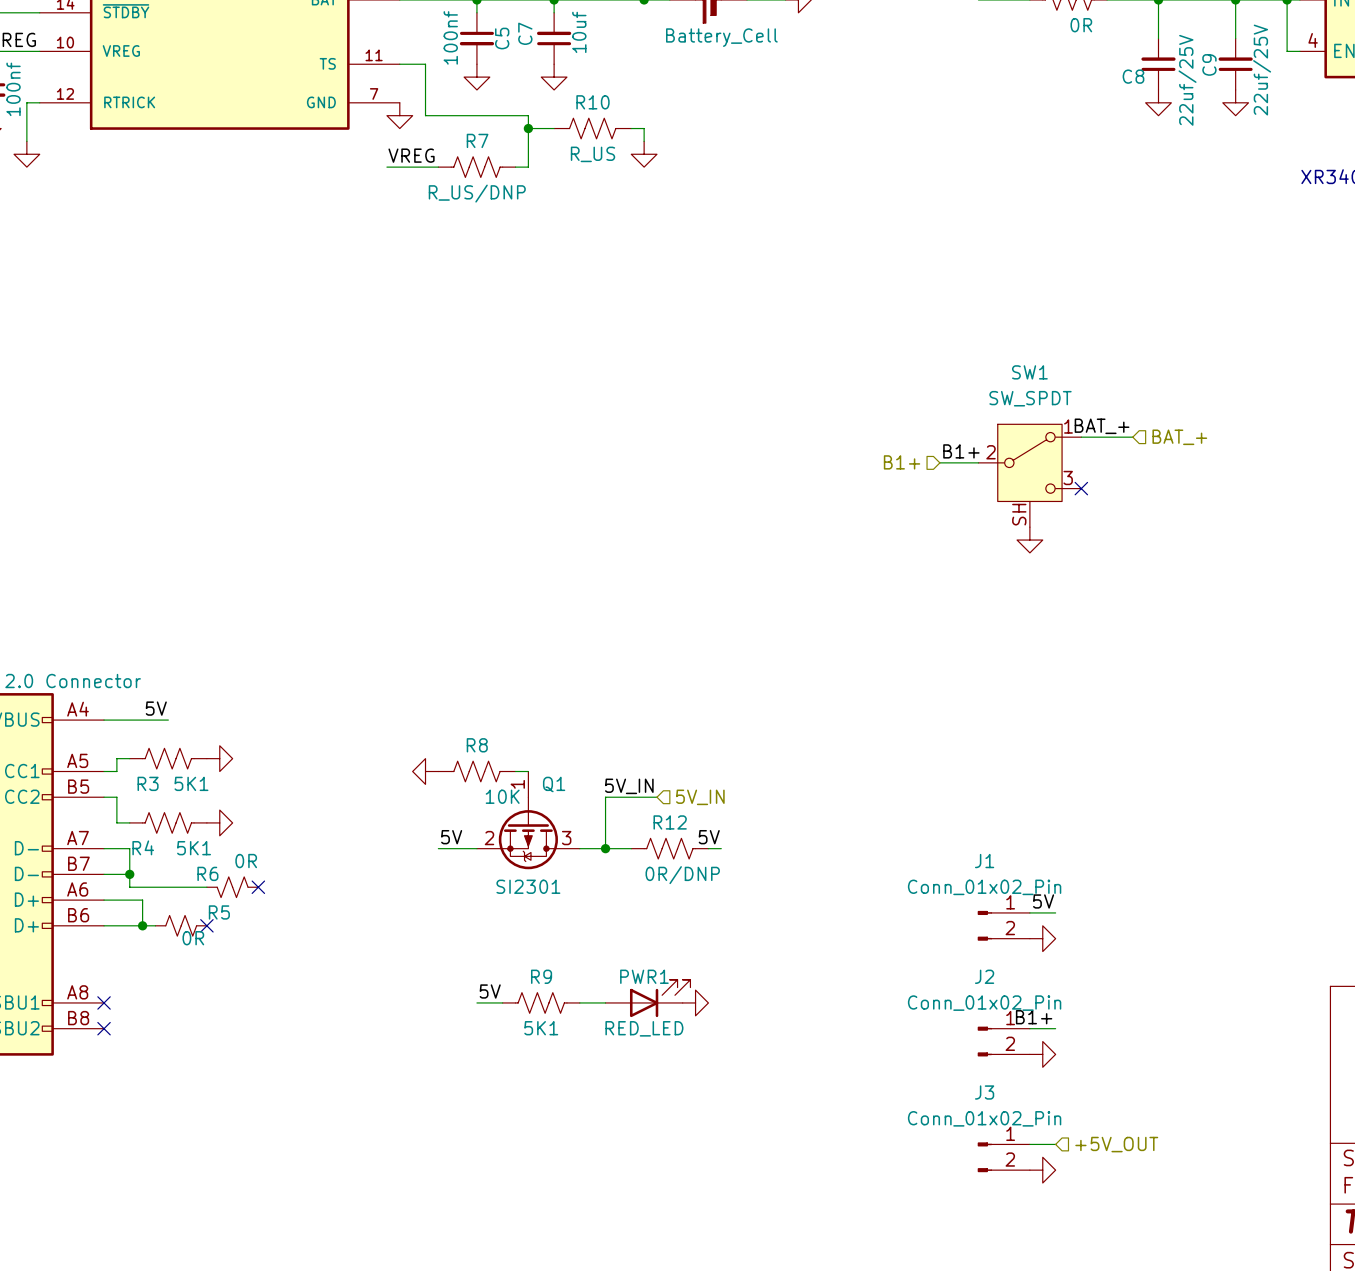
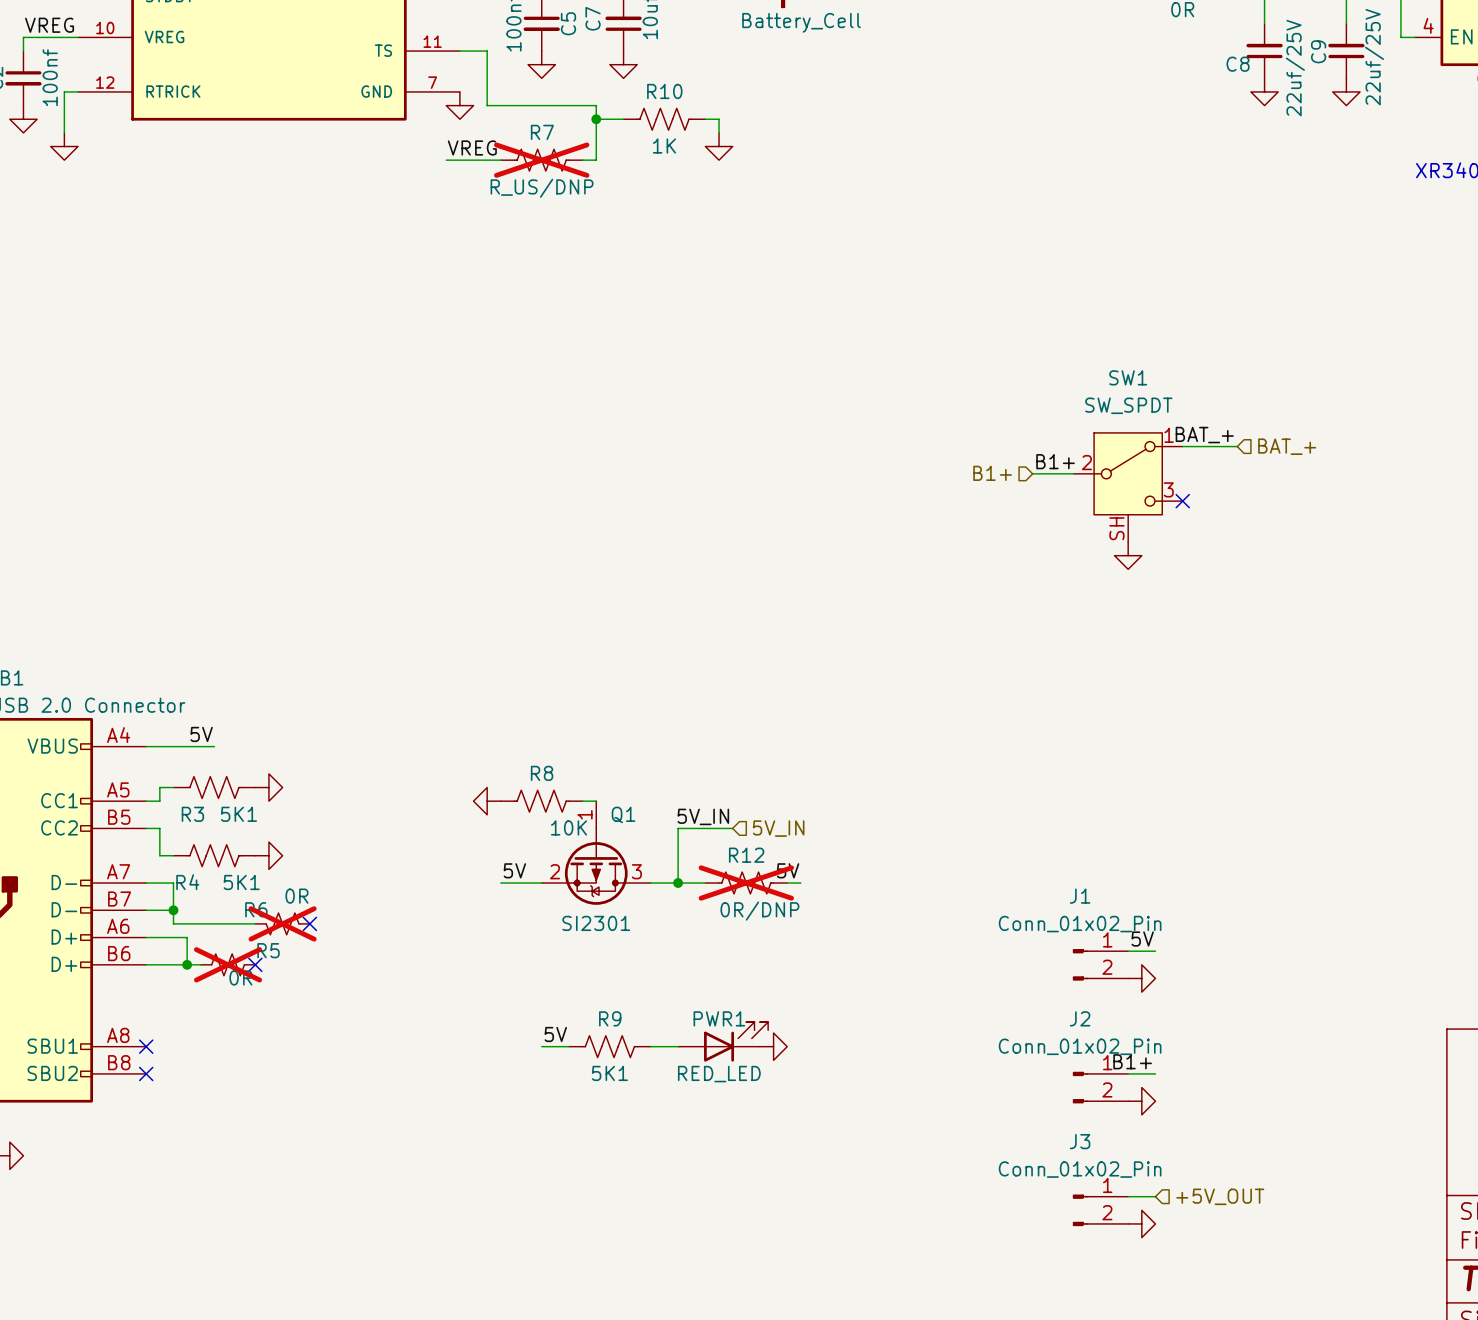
R10 value: R_US (592, 154) -> 1K (664, 146)
R7 do-not-place cross: none -> (541, 160)
R12 do-not-place cross: none -> (746, 883)
R6 do-not-place cross: none -> (282, 923)
R5 do-not-place cross: none -> (228, 964)

